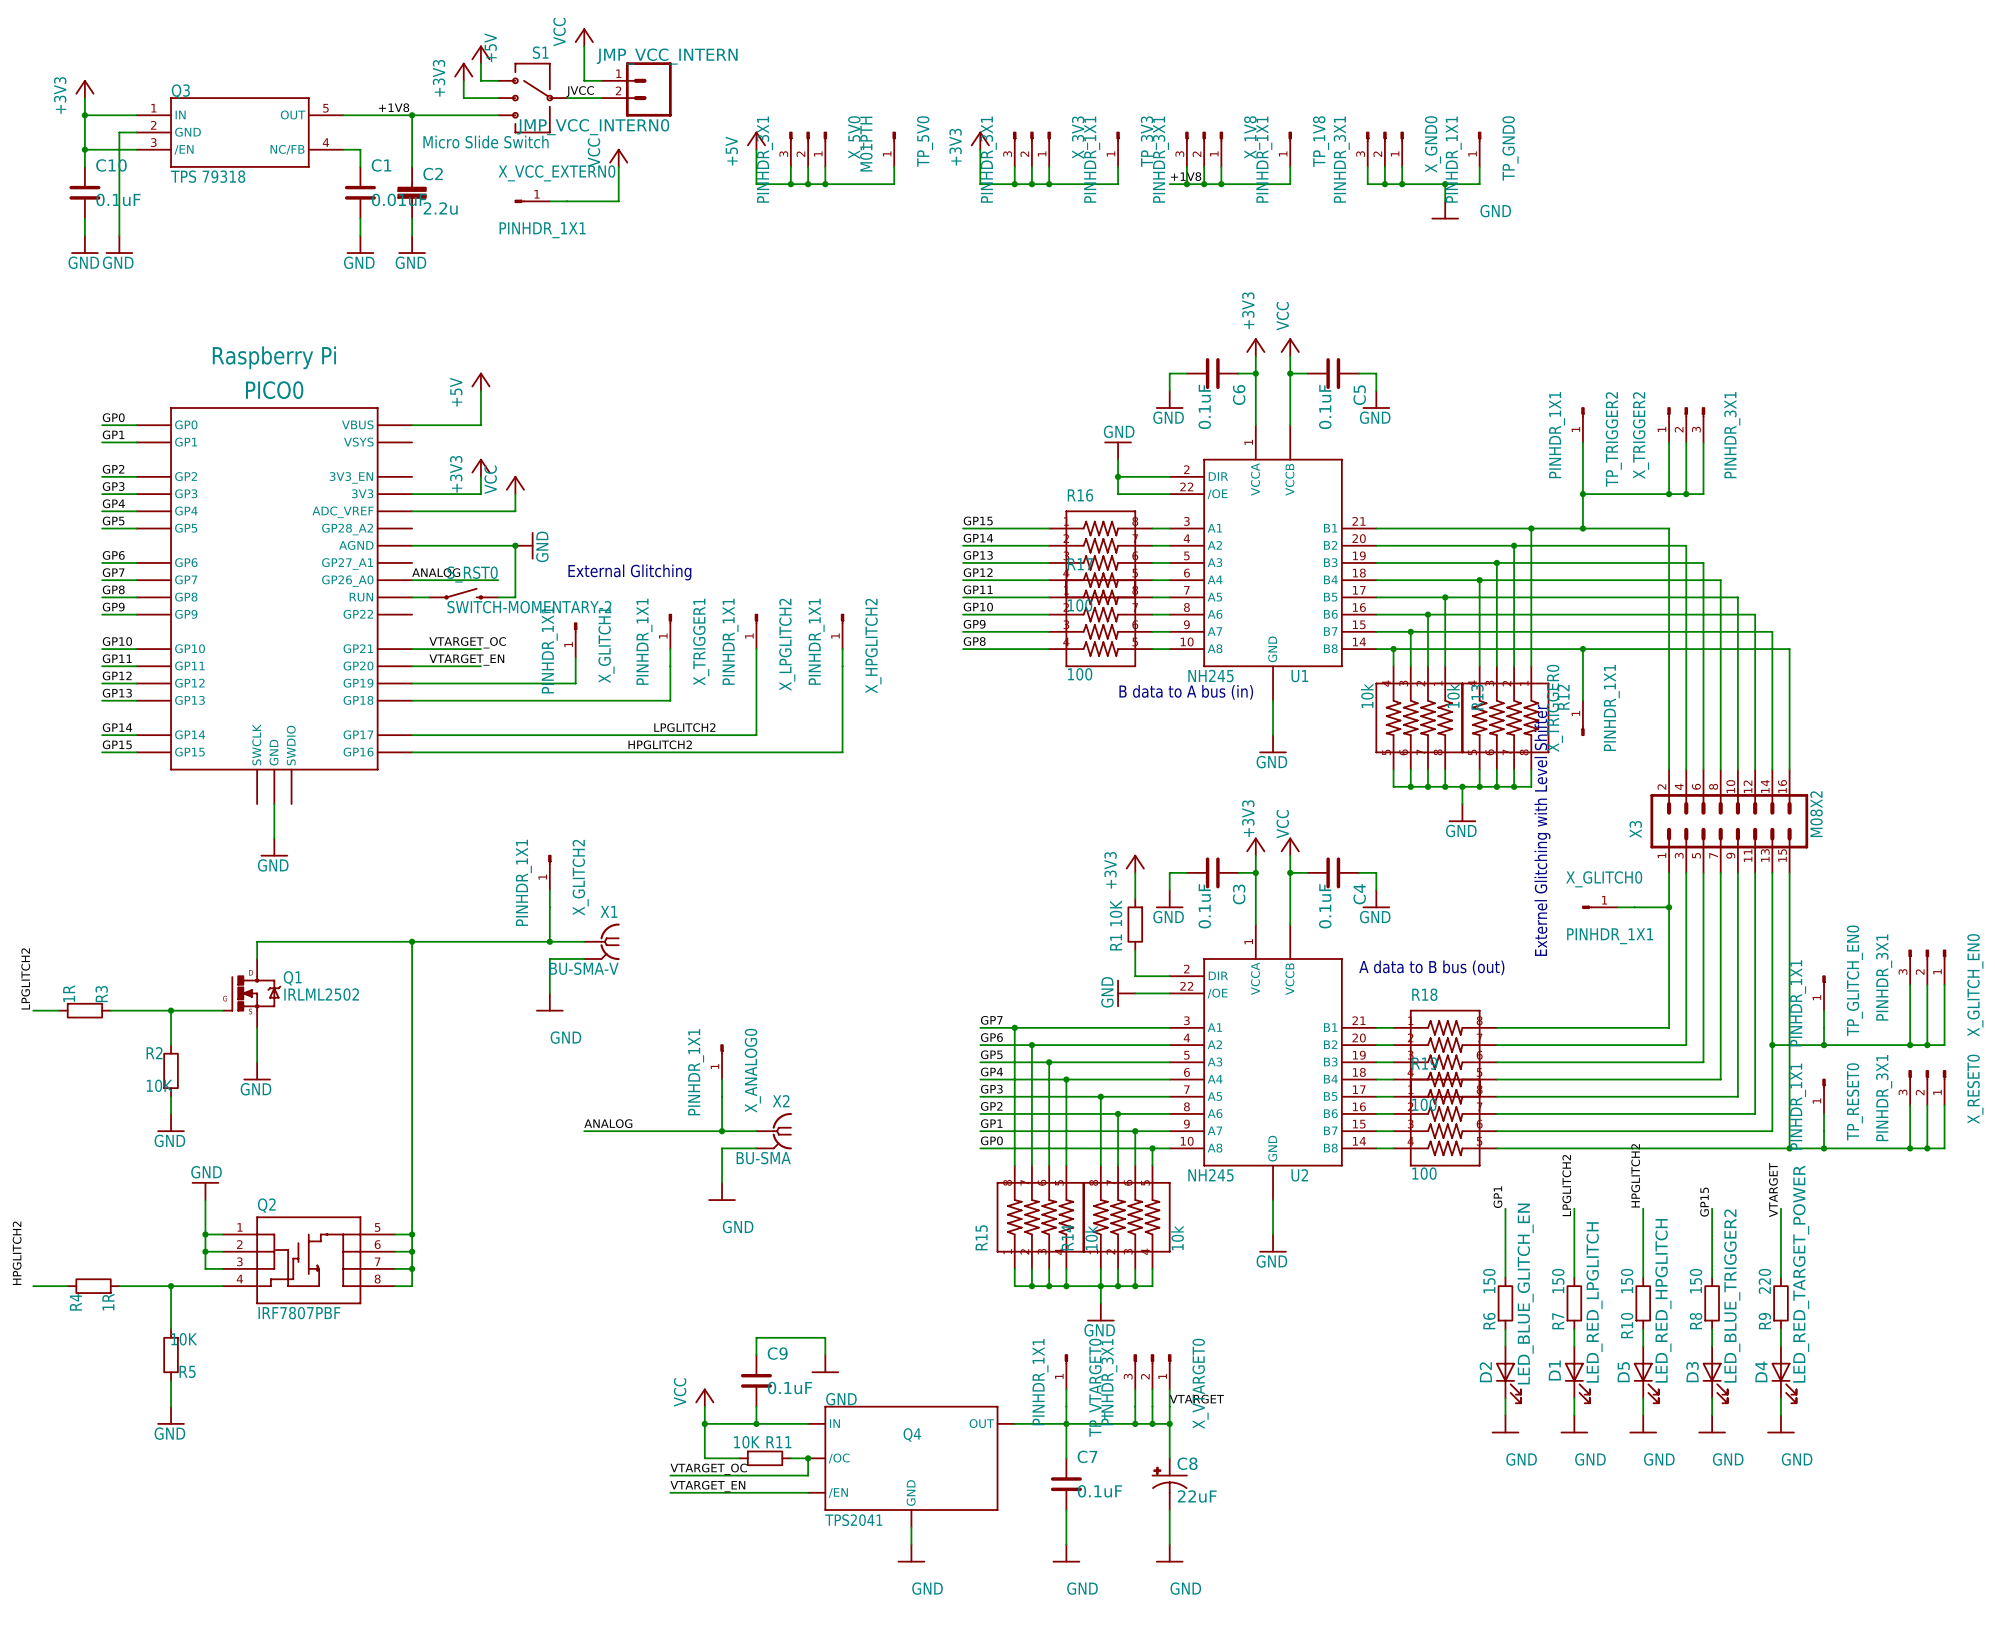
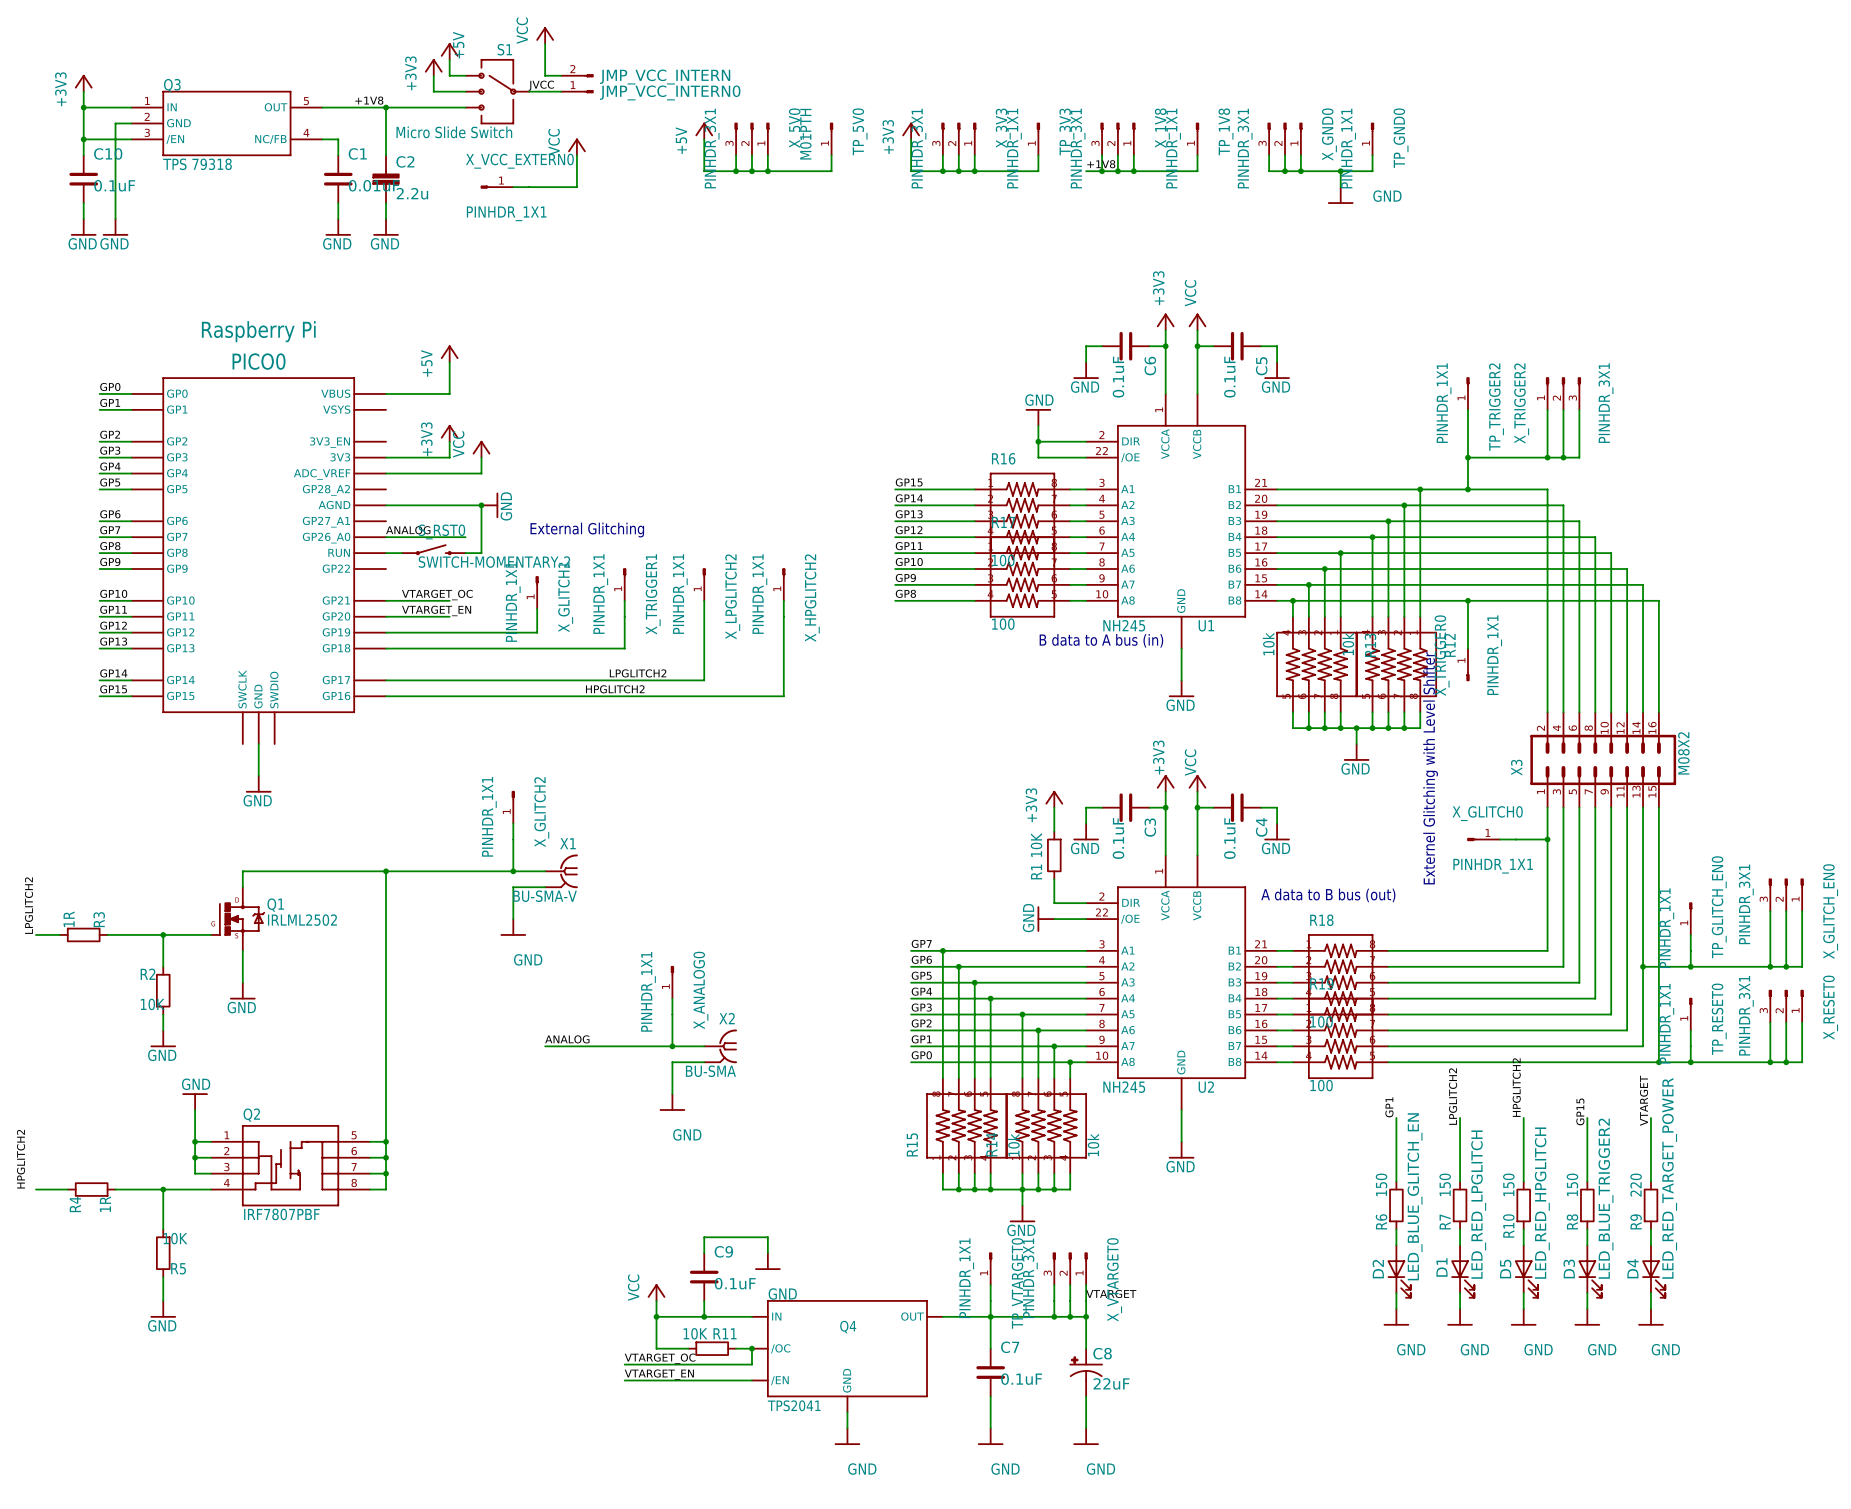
JMP_VCC_INTERN0 value position: JMP_VCC_INTERN (667, 56) -> JMP_VCC_INTERN (665, 77)
JMP_VCC_INTERN0 symbol: [601, 62, 672, 117] -> [561, 74, 594, 93]
JMP_VCC_INTERN0 name position: JMP_VCC_INTERN0 (593, 127) -> JMP_VCC_INTERN0 (670, 92)

